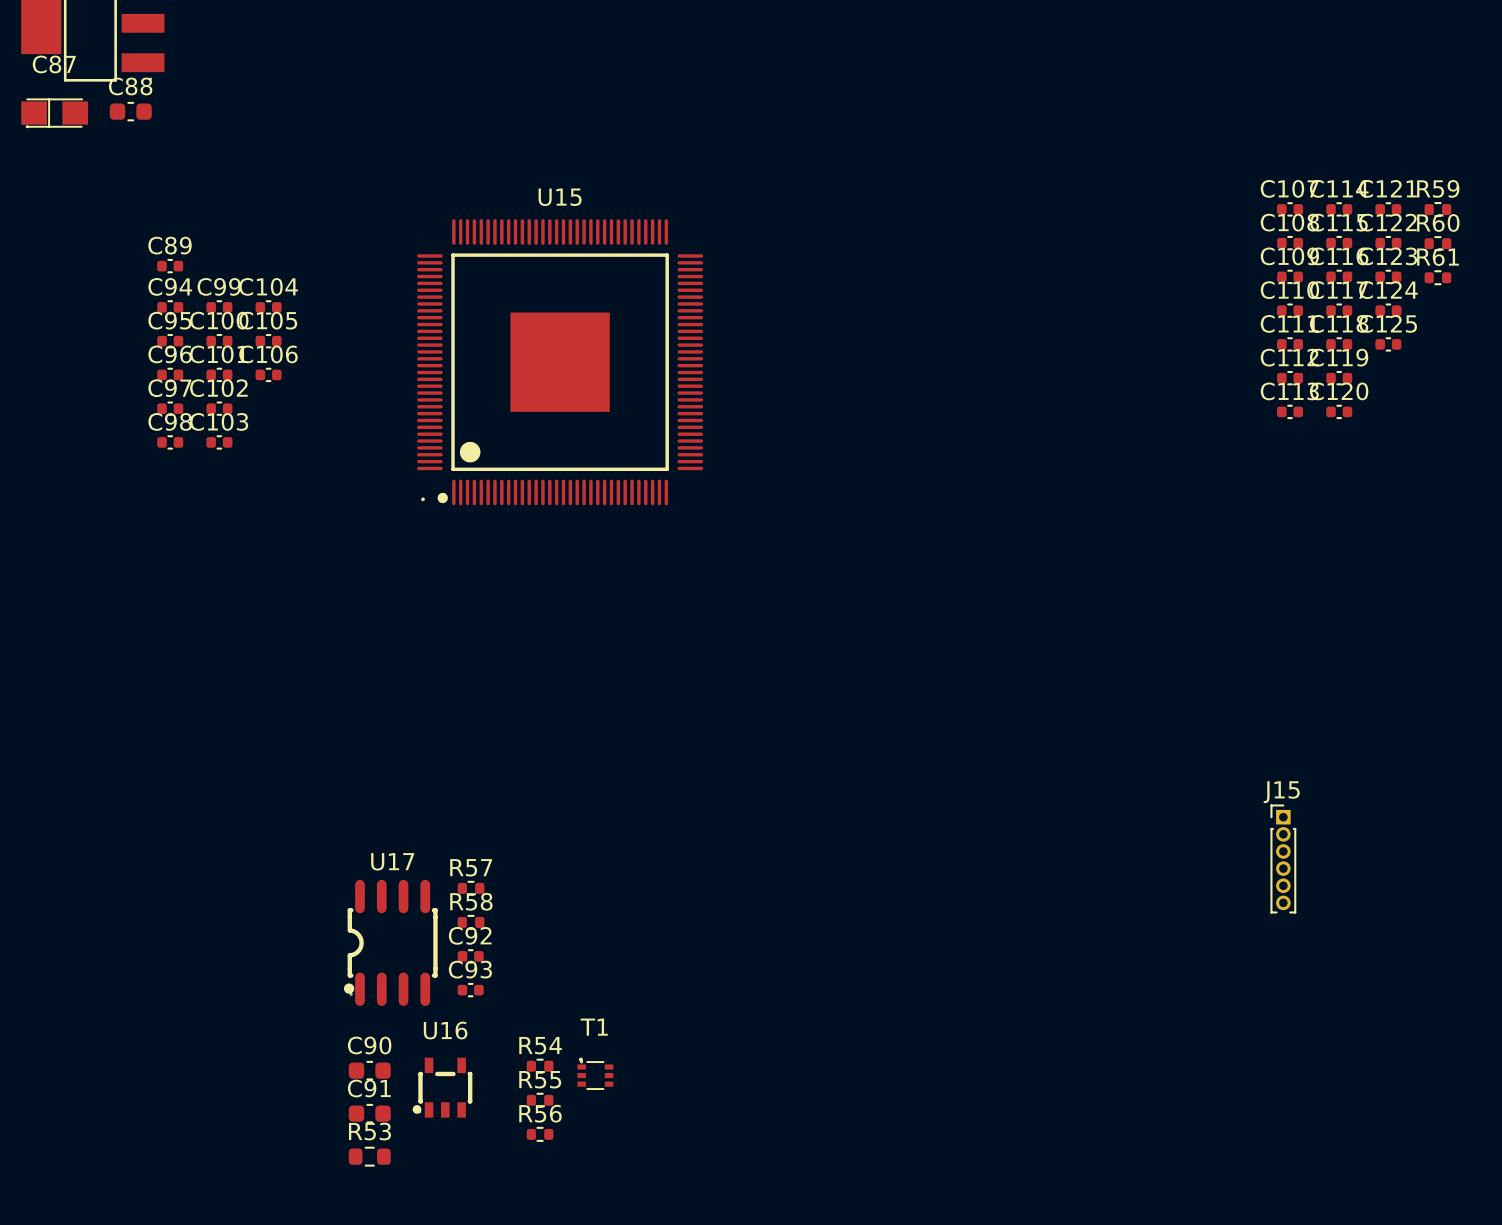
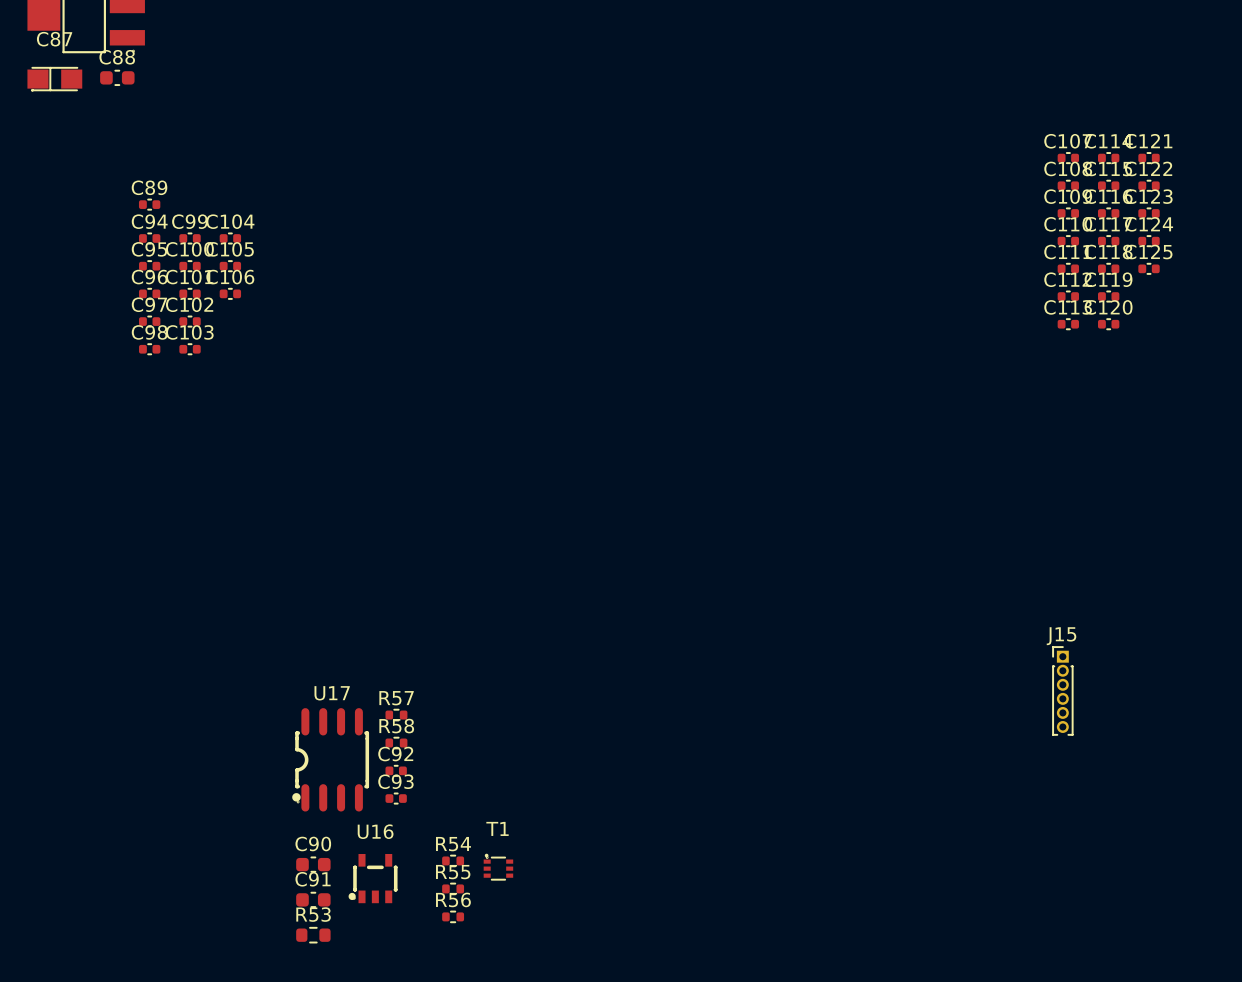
R59: (1437, 209) -> none
R60: (1437, 243) -> none
R61: (1437, 277) -> none
U15: (560, 362) -> none

